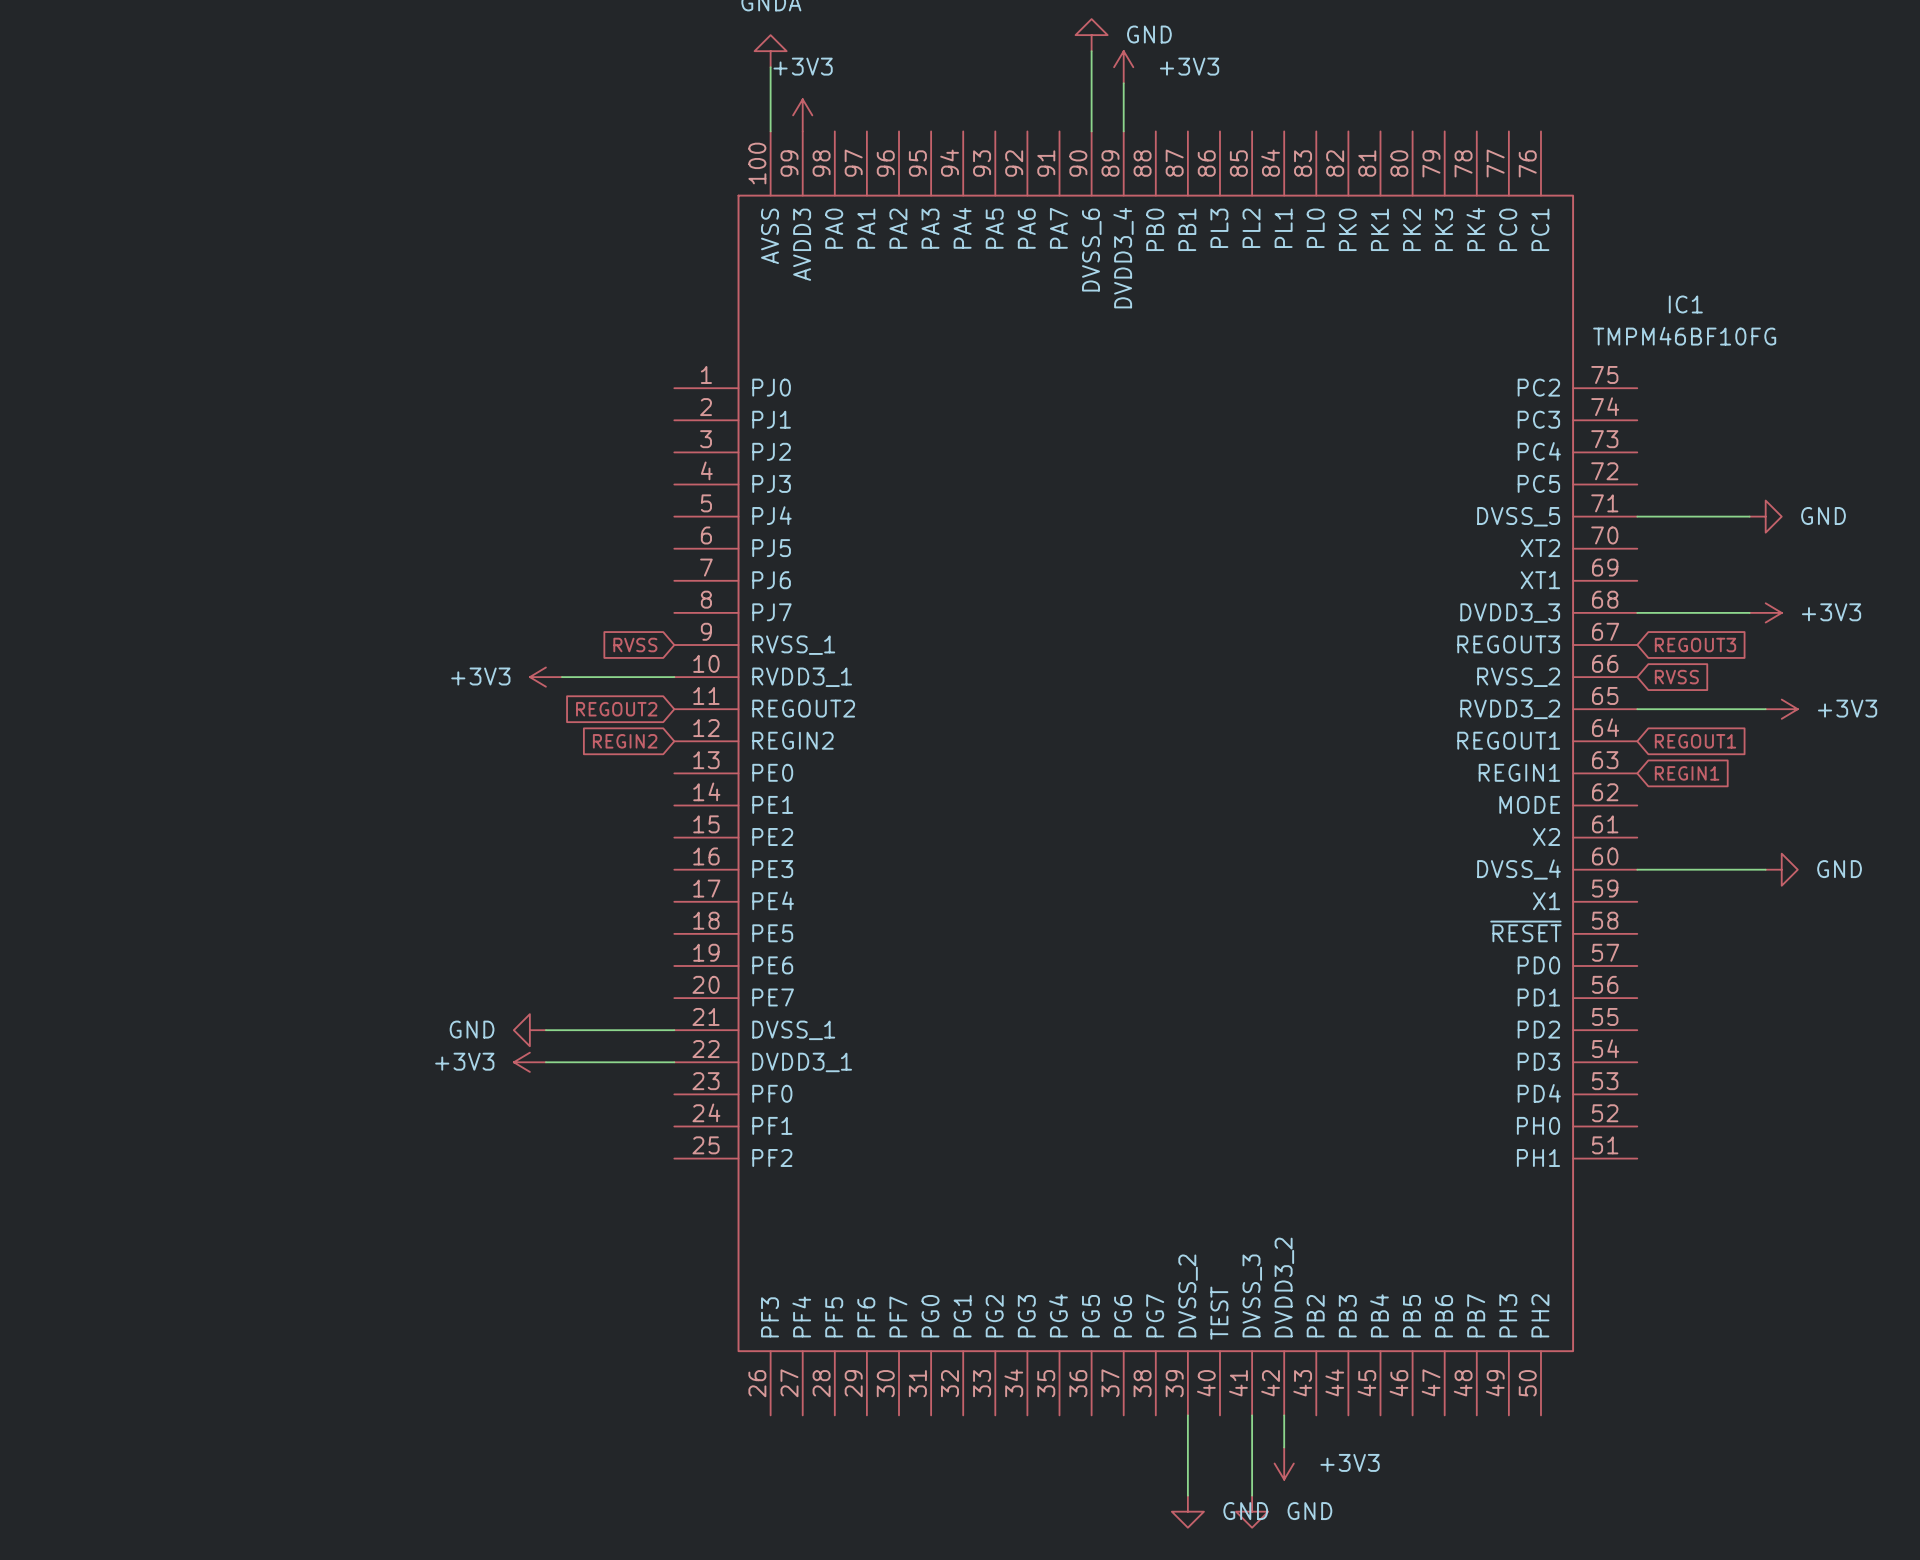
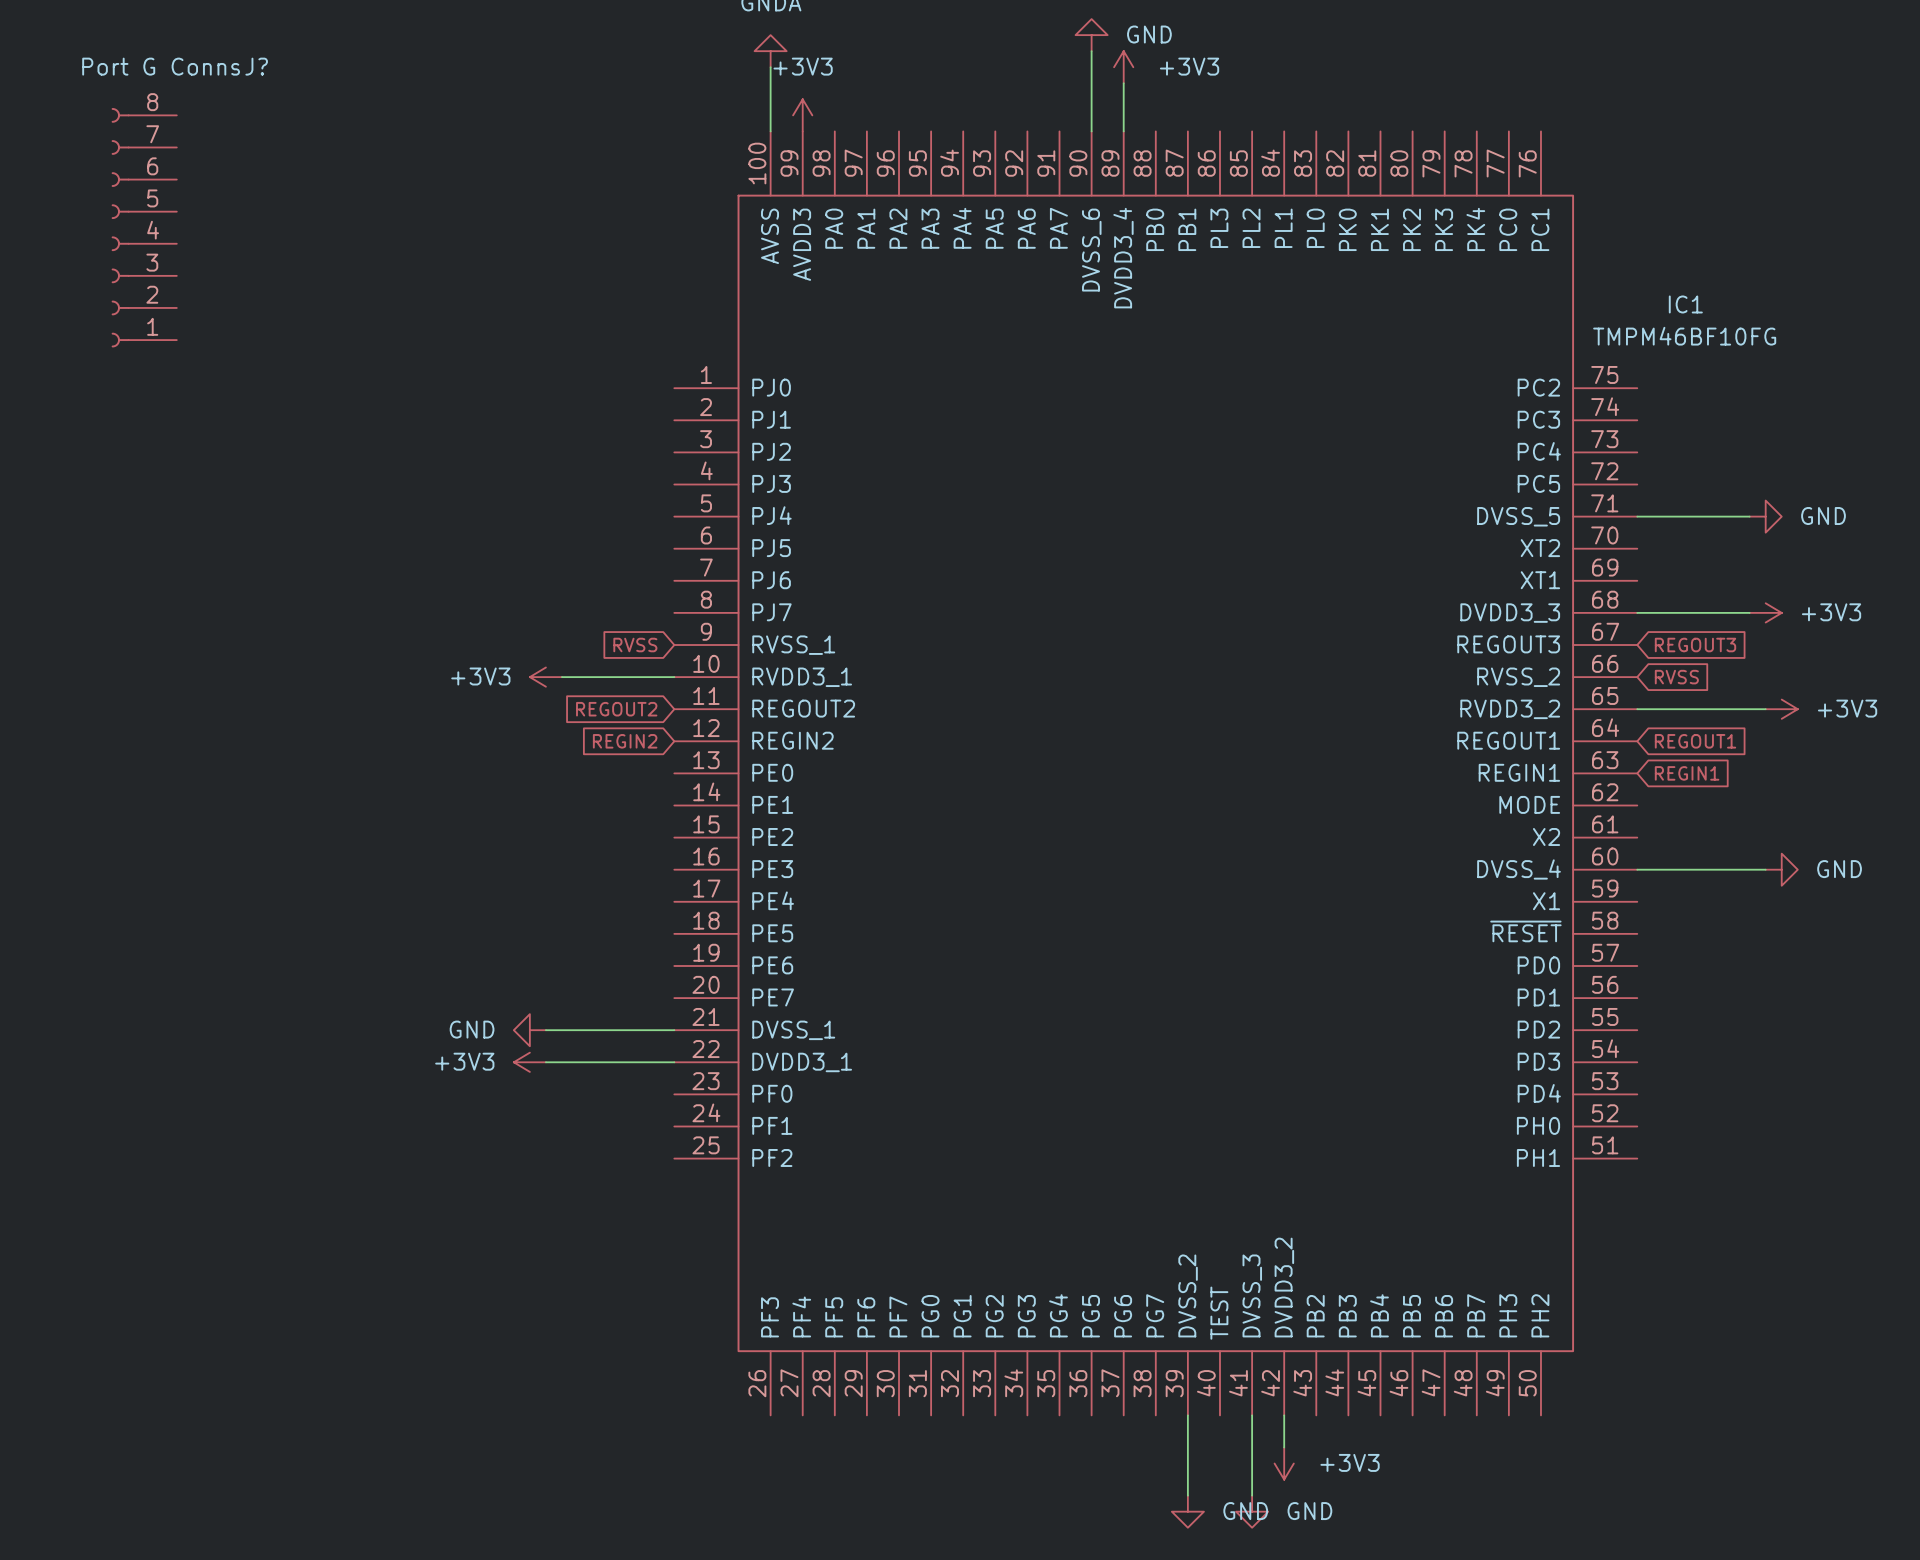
J?: none -> Port G Conns (144, 227)

